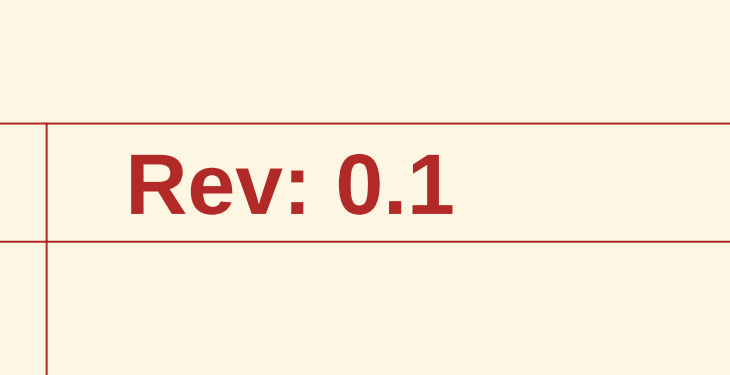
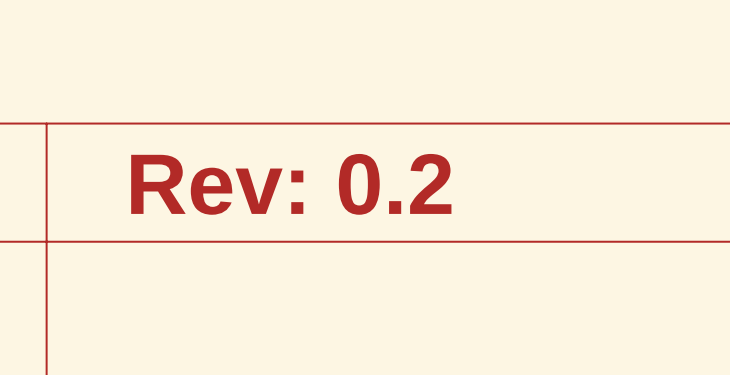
title block: Rev: 0.1 (291, 184) -> Rev: 0.2 (291, 184)

